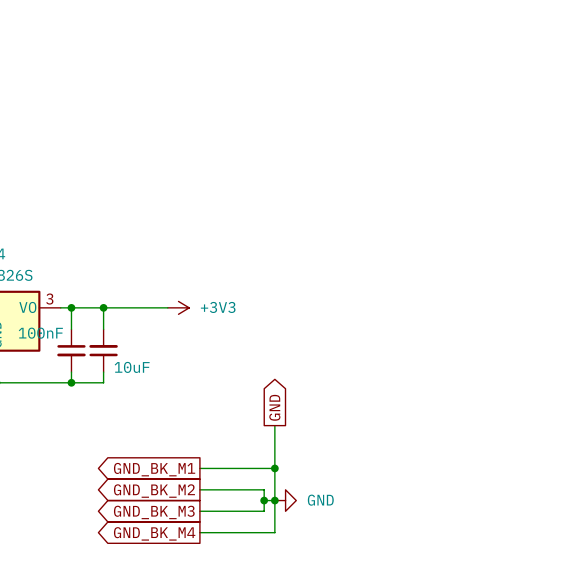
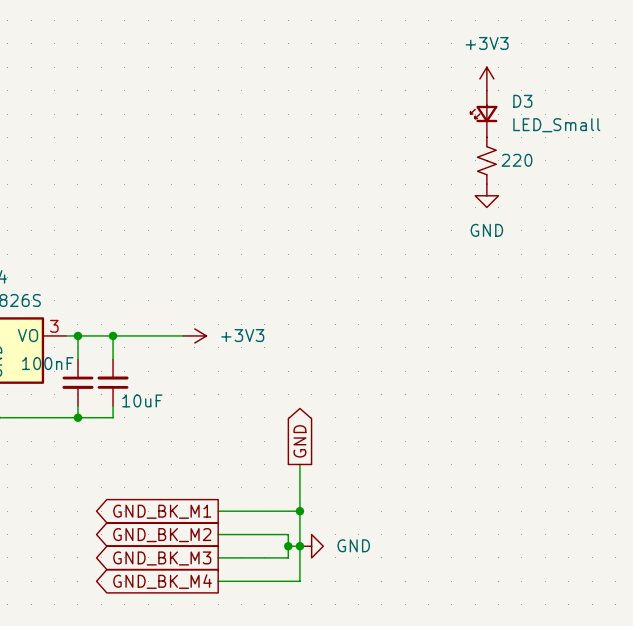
power symbol: none -> +3V3 (486, 78)
D3: none -> LED_Small (483, 114)
part: none -> 220 (486, 160)
power symbol: none -> GND (486, 195)

